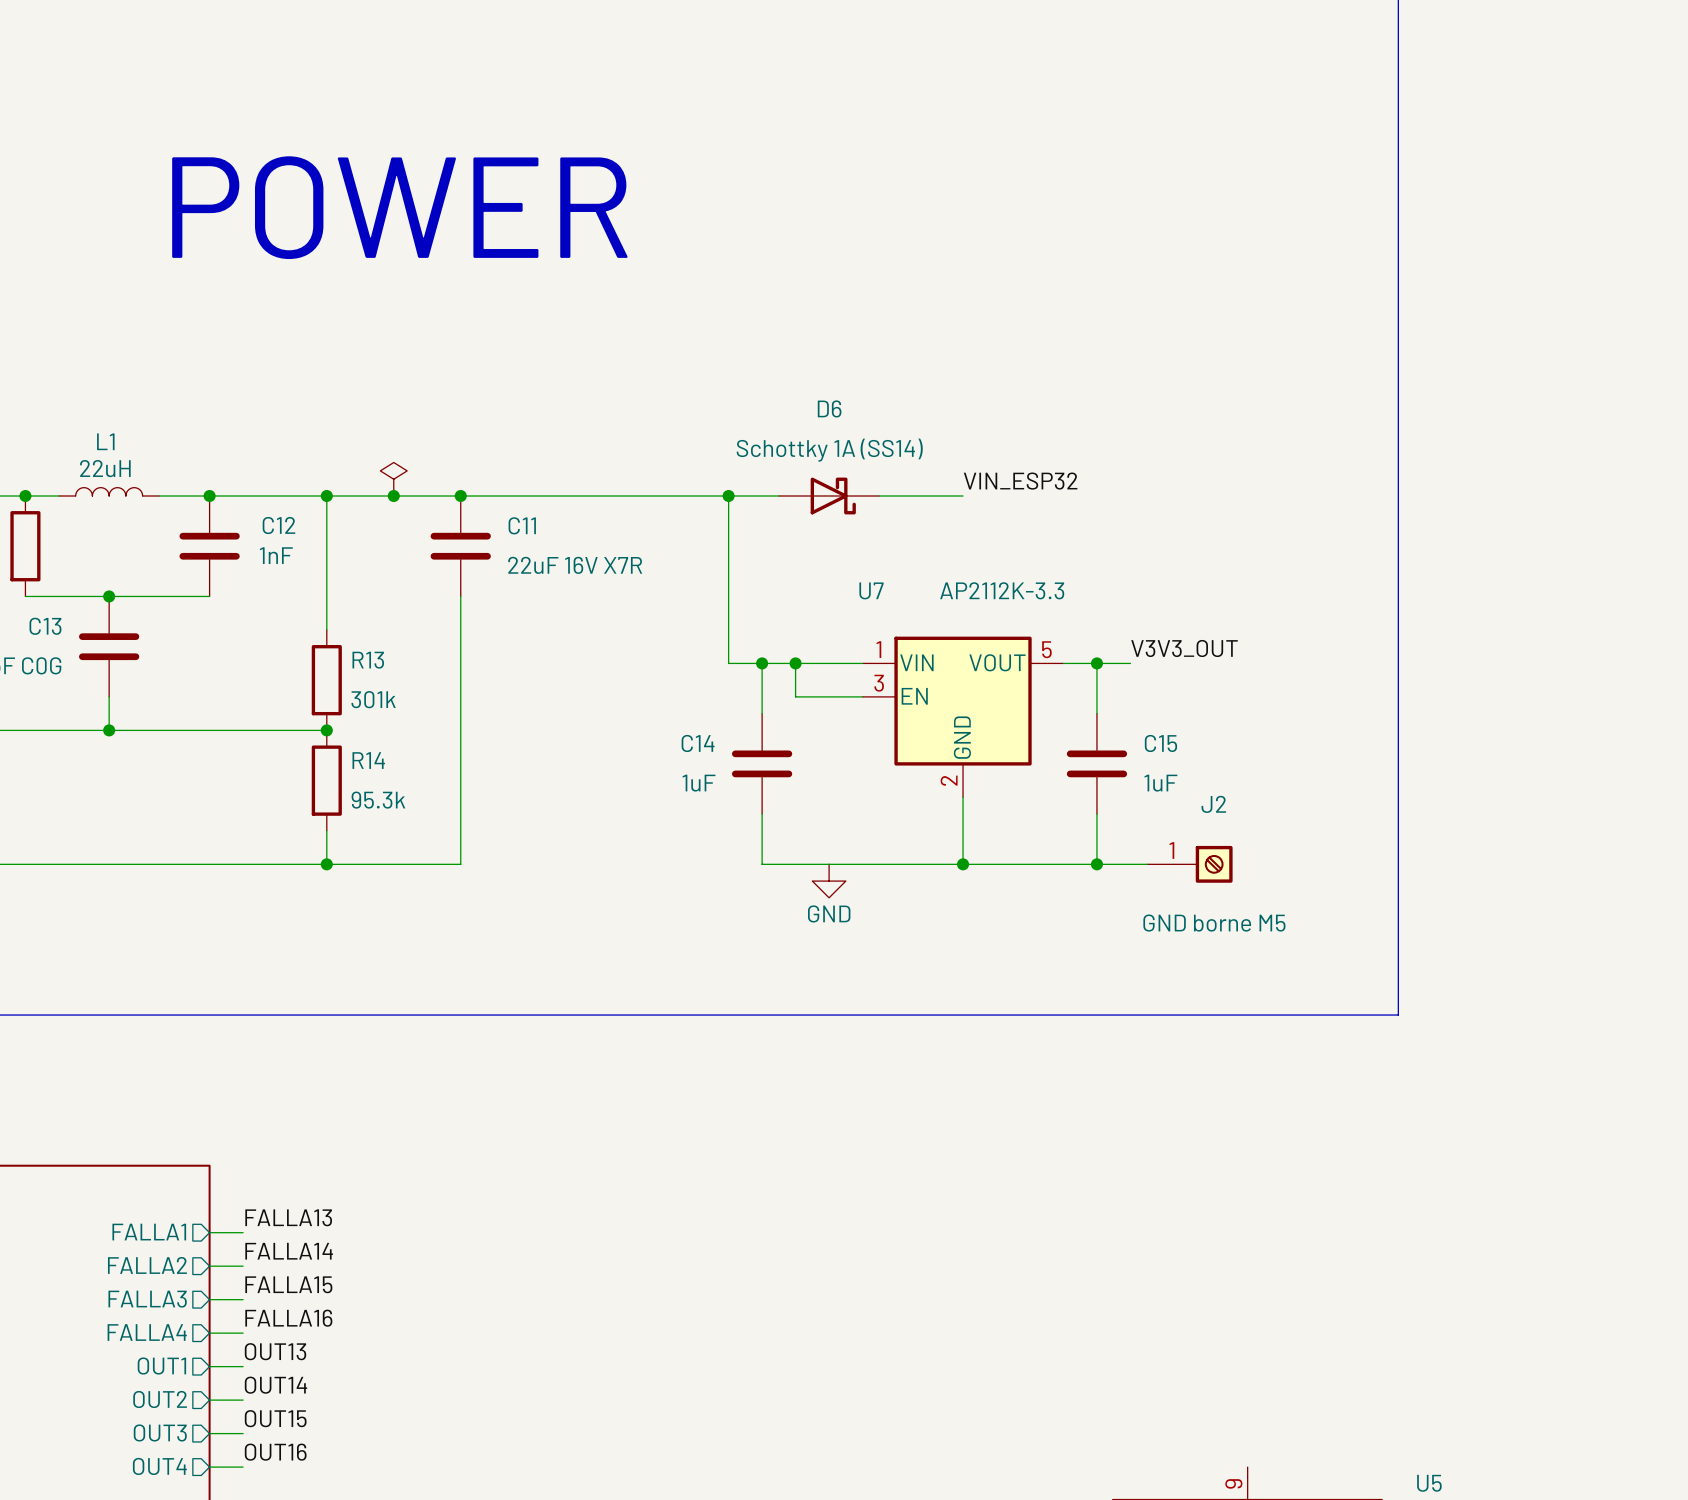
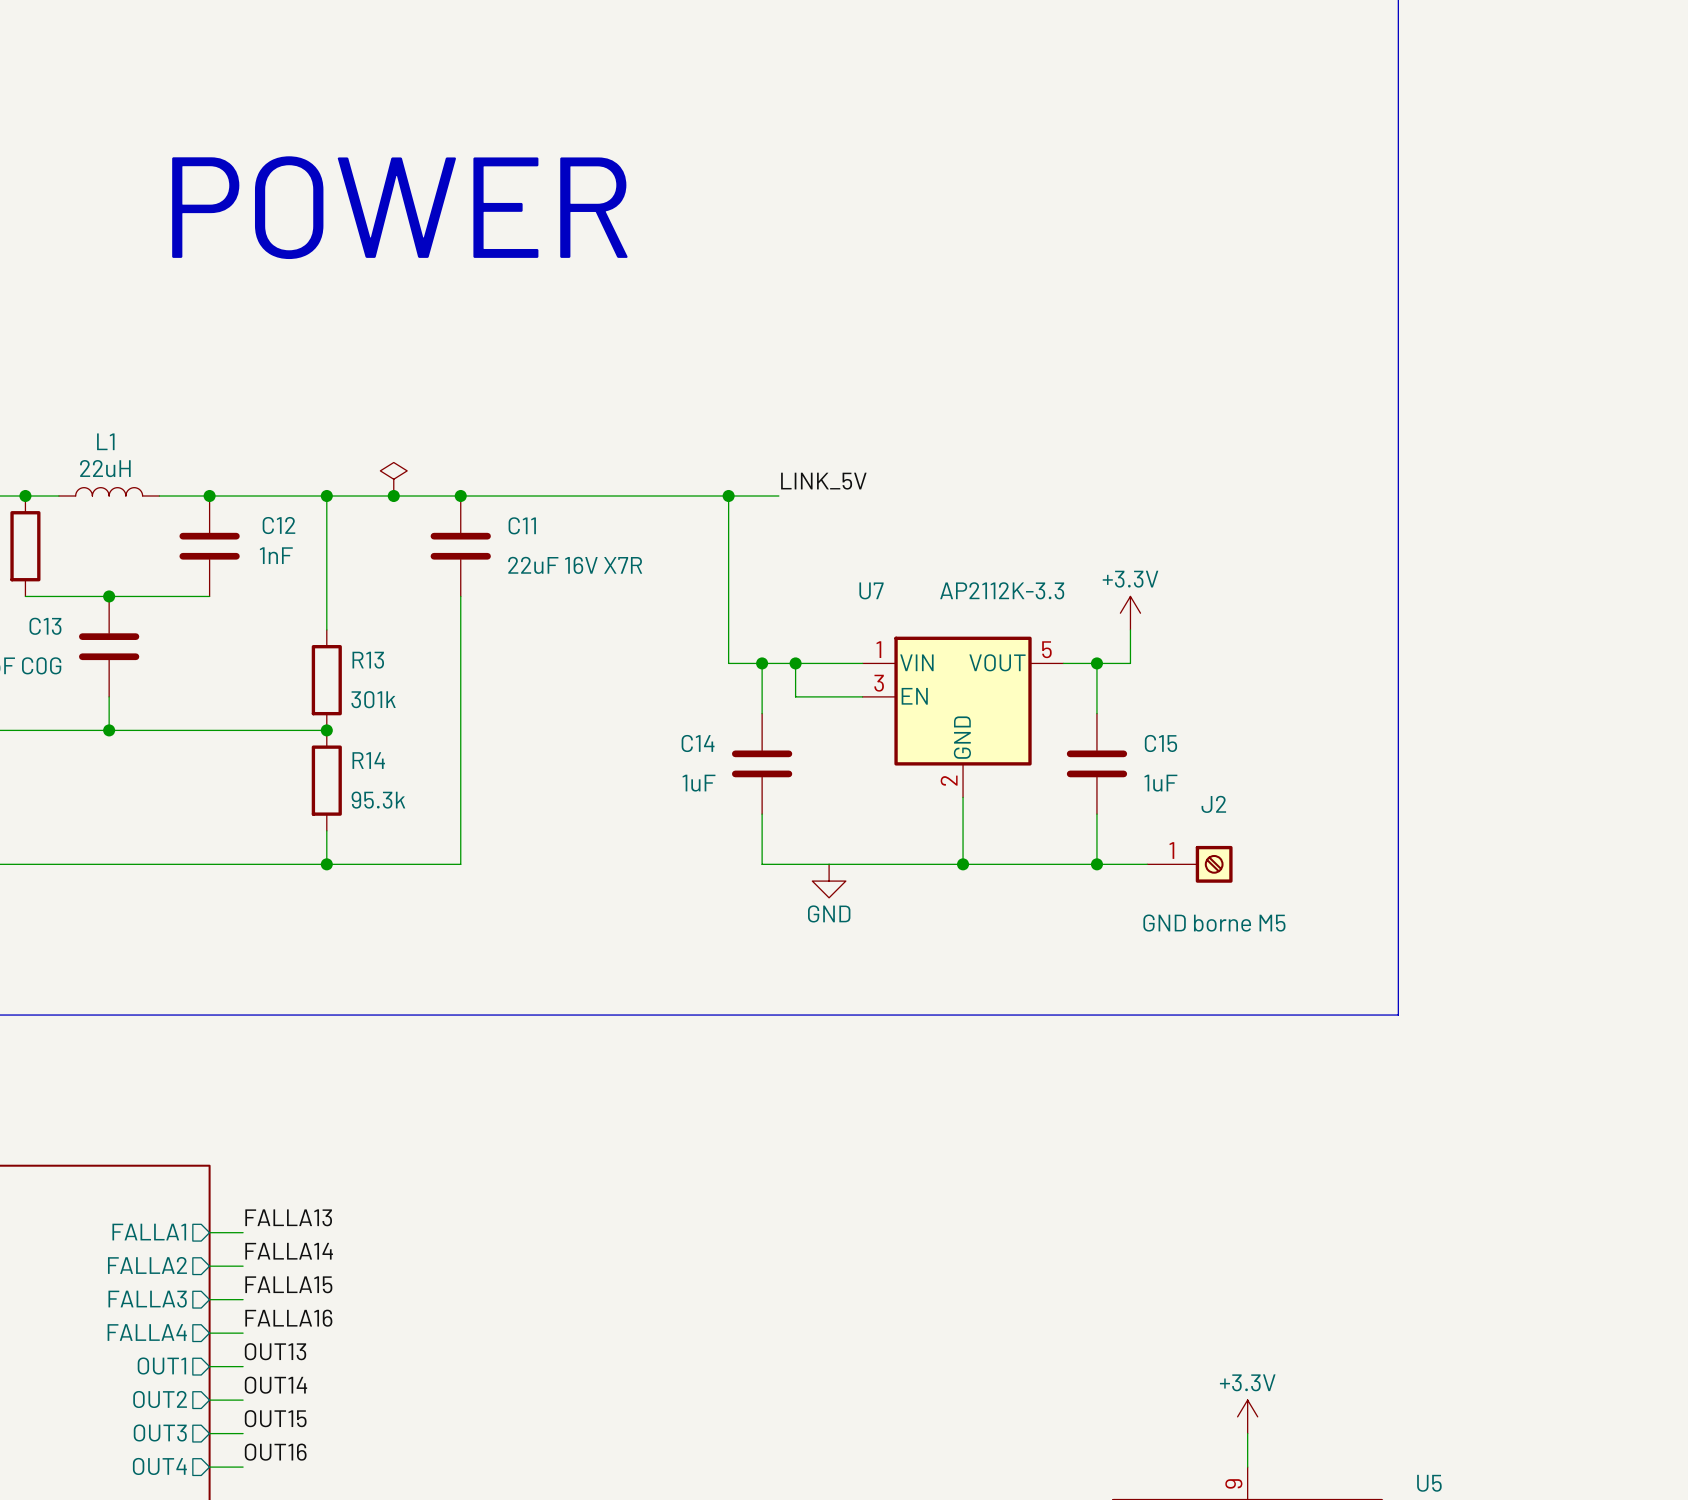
label: none -> LINK_5V (823, 481)
label: VIN_ESP32 (1020, 481) -> none
D6: Schottky 1A (SS14) (829, 496) -> none
wire: (879, 496) (963, 496) -> none
power symbol: none -> +3.3V (1130, 613)
wire: none -> (1130, 629) (1130, 663)
label: V3V3_OUT (1184, 648) -> none
power symbol: none -> +3.3V (1247, 1416)
wire: none -> (1247, 1433) (1247, 1467)

